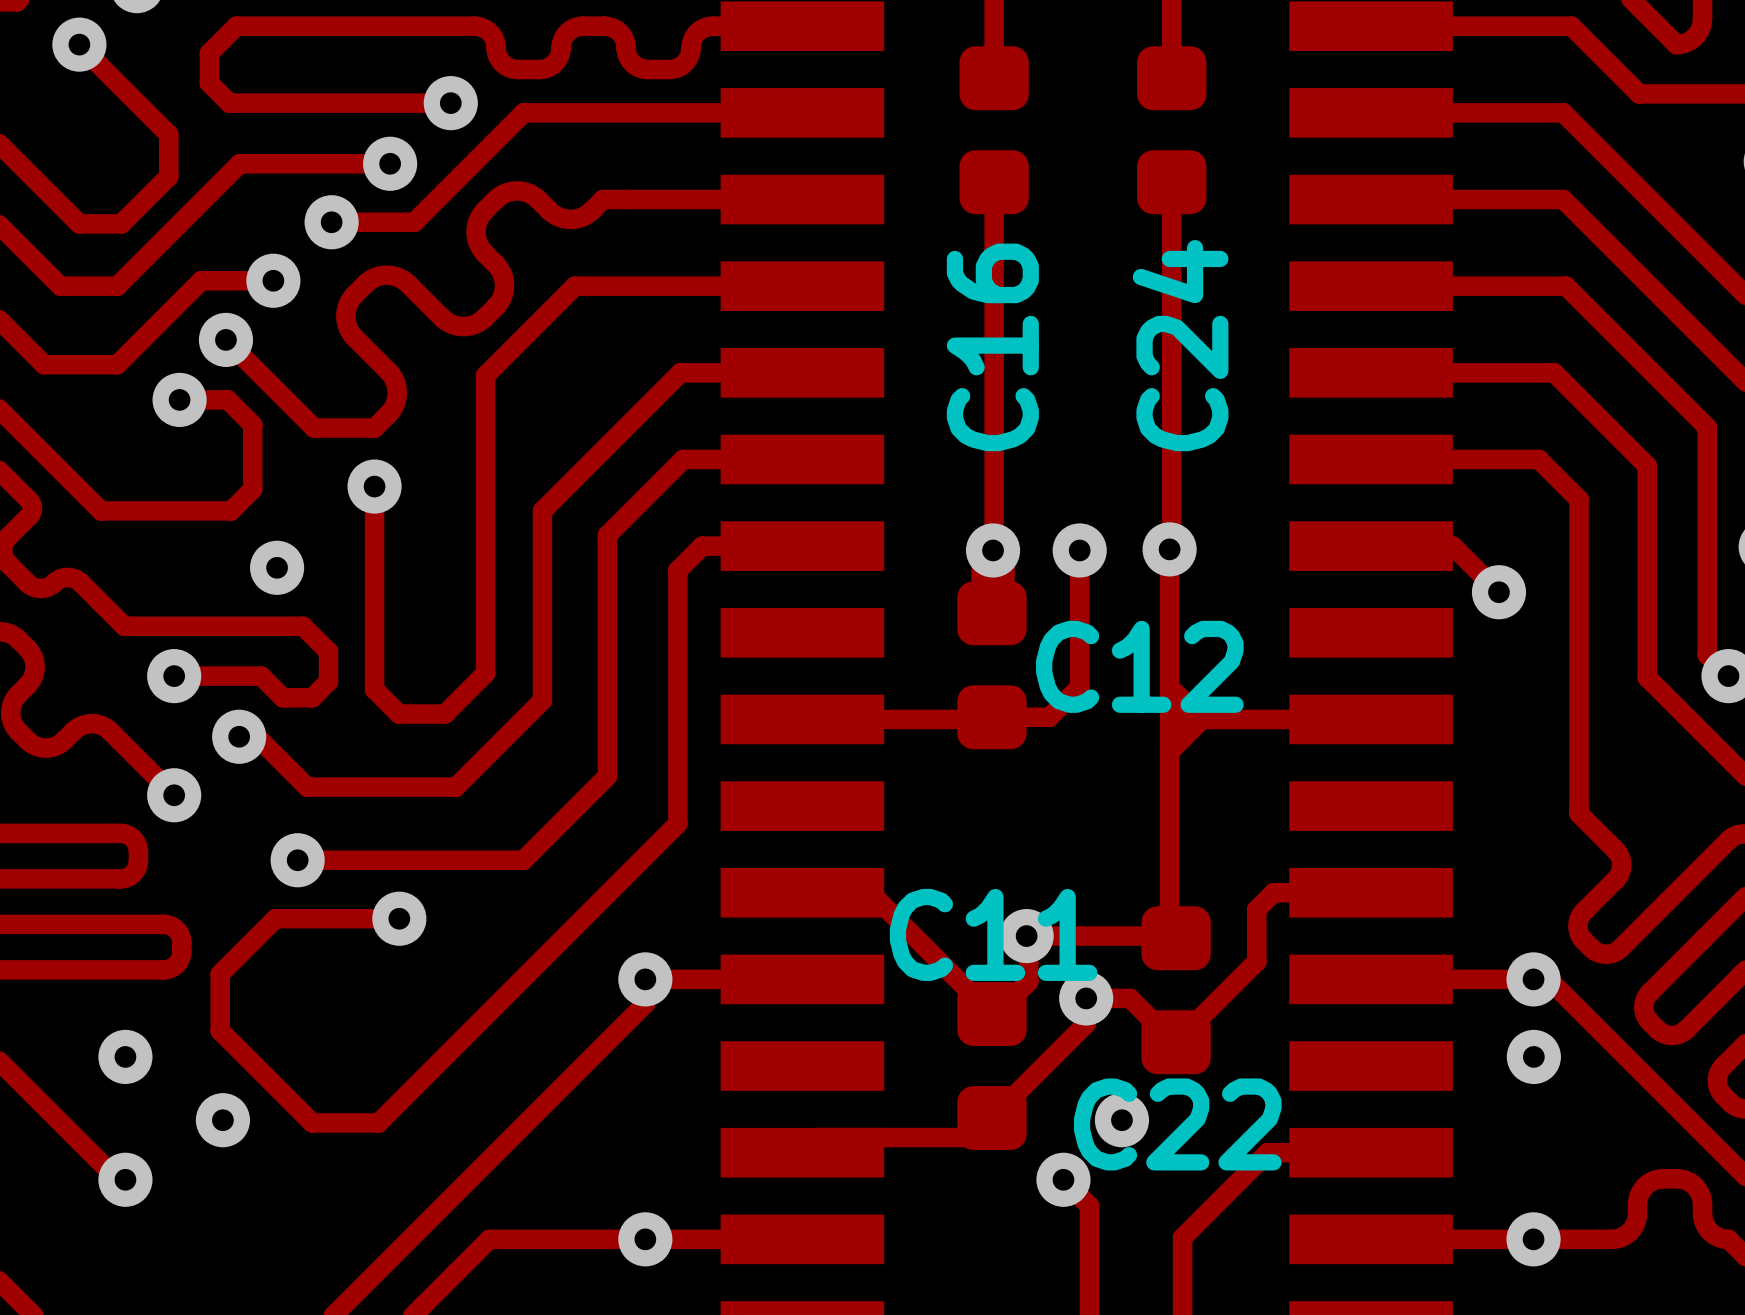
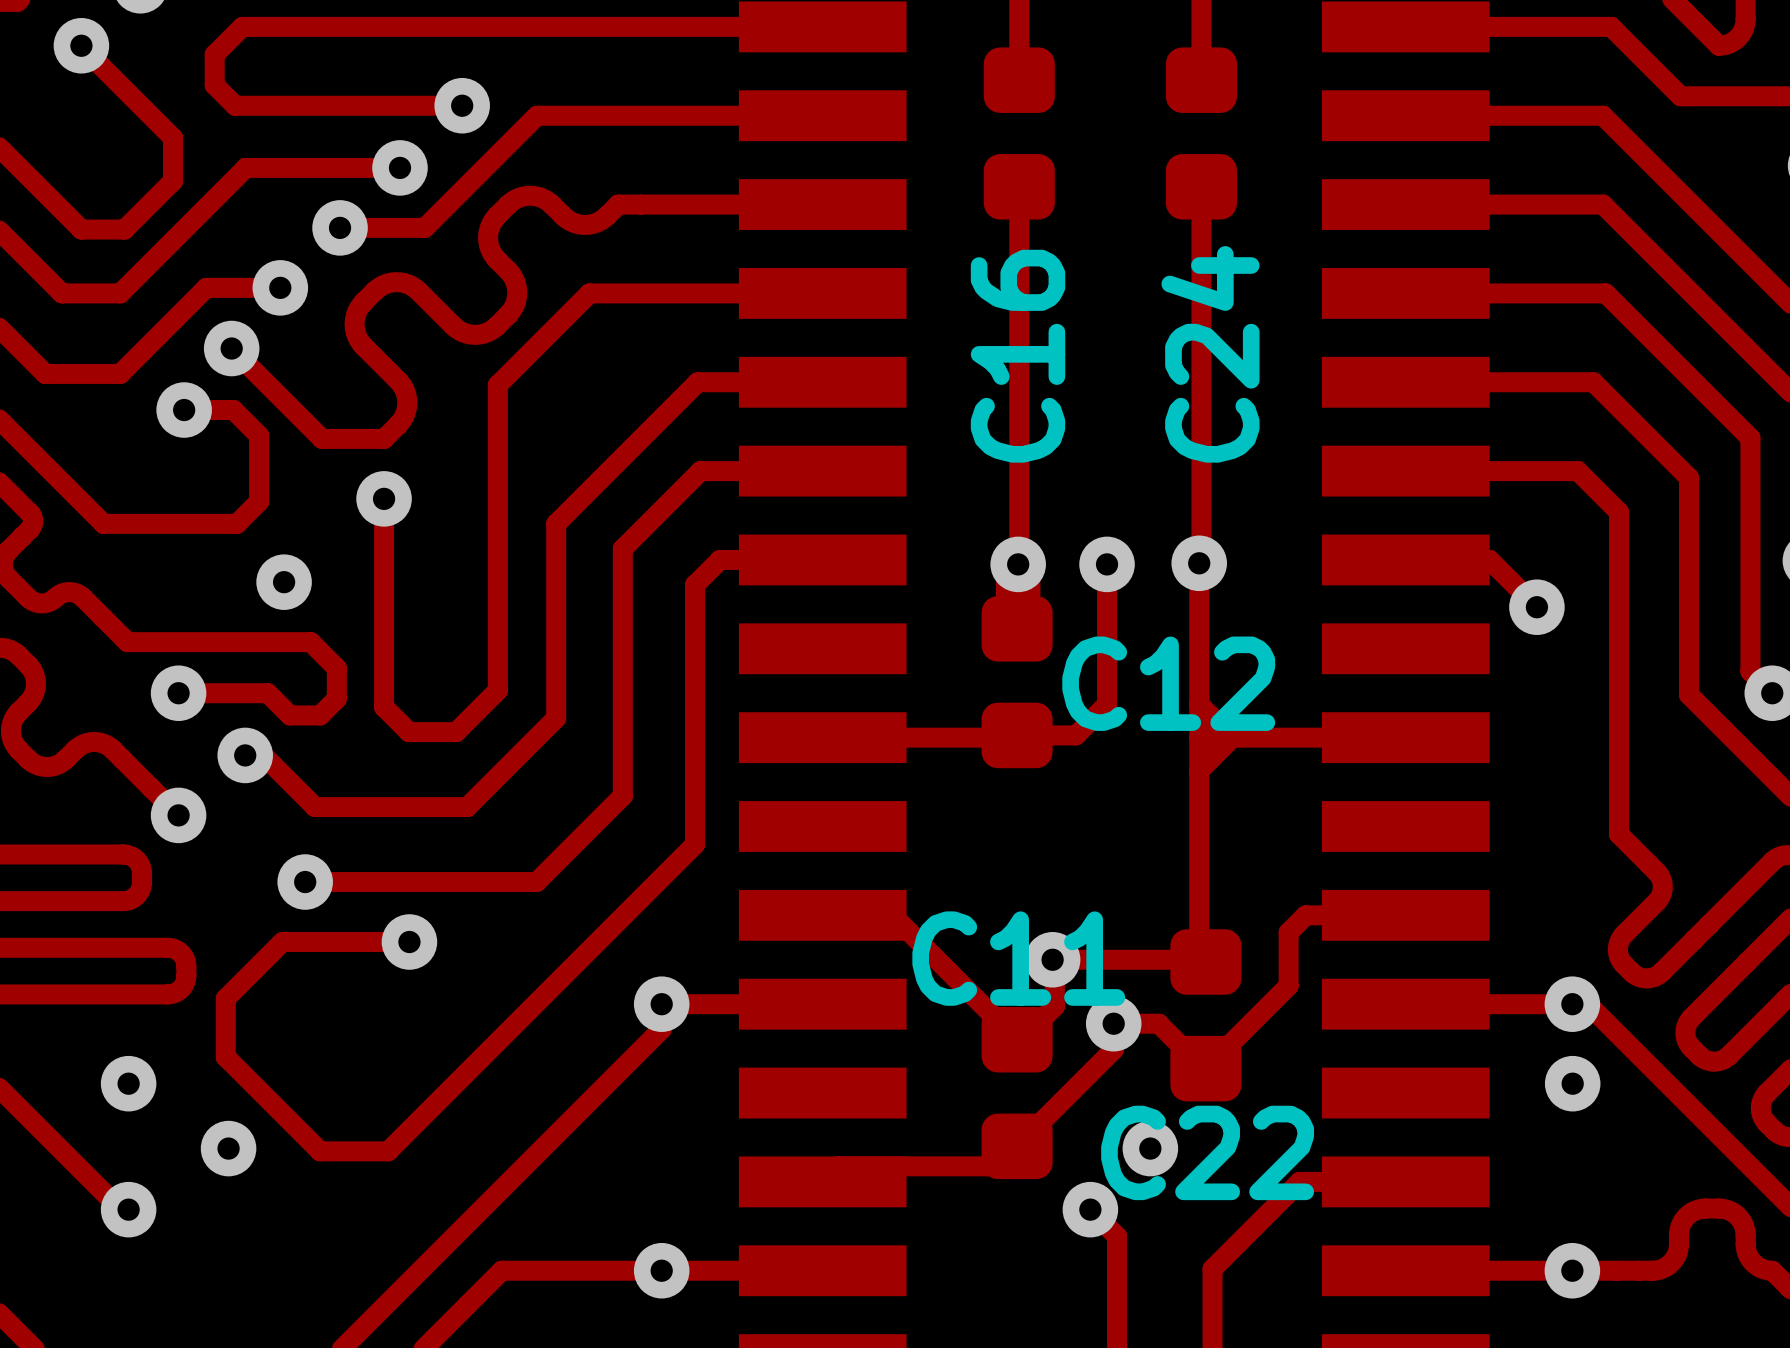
track: (474, 26) (482, 27) (489, 32) (494, 39) (496, 53) (500, 61) (506, 66) (517, 69) (542, 69) (550, 66) (559, 56) (561, 42) (565, 34) (571, 29) (582, 26) -> (486, 26) (597, 26)
track: (604, 26) (615, 29) (621, 34) (625, 42) (627, 56) (632, 63) (639, 67) (647, 69) (672, 69) (680, 66) (689, 56) (691, 42) (695, 34) (701, 29) (712, 26) -> (619, 26) (730, 26)

